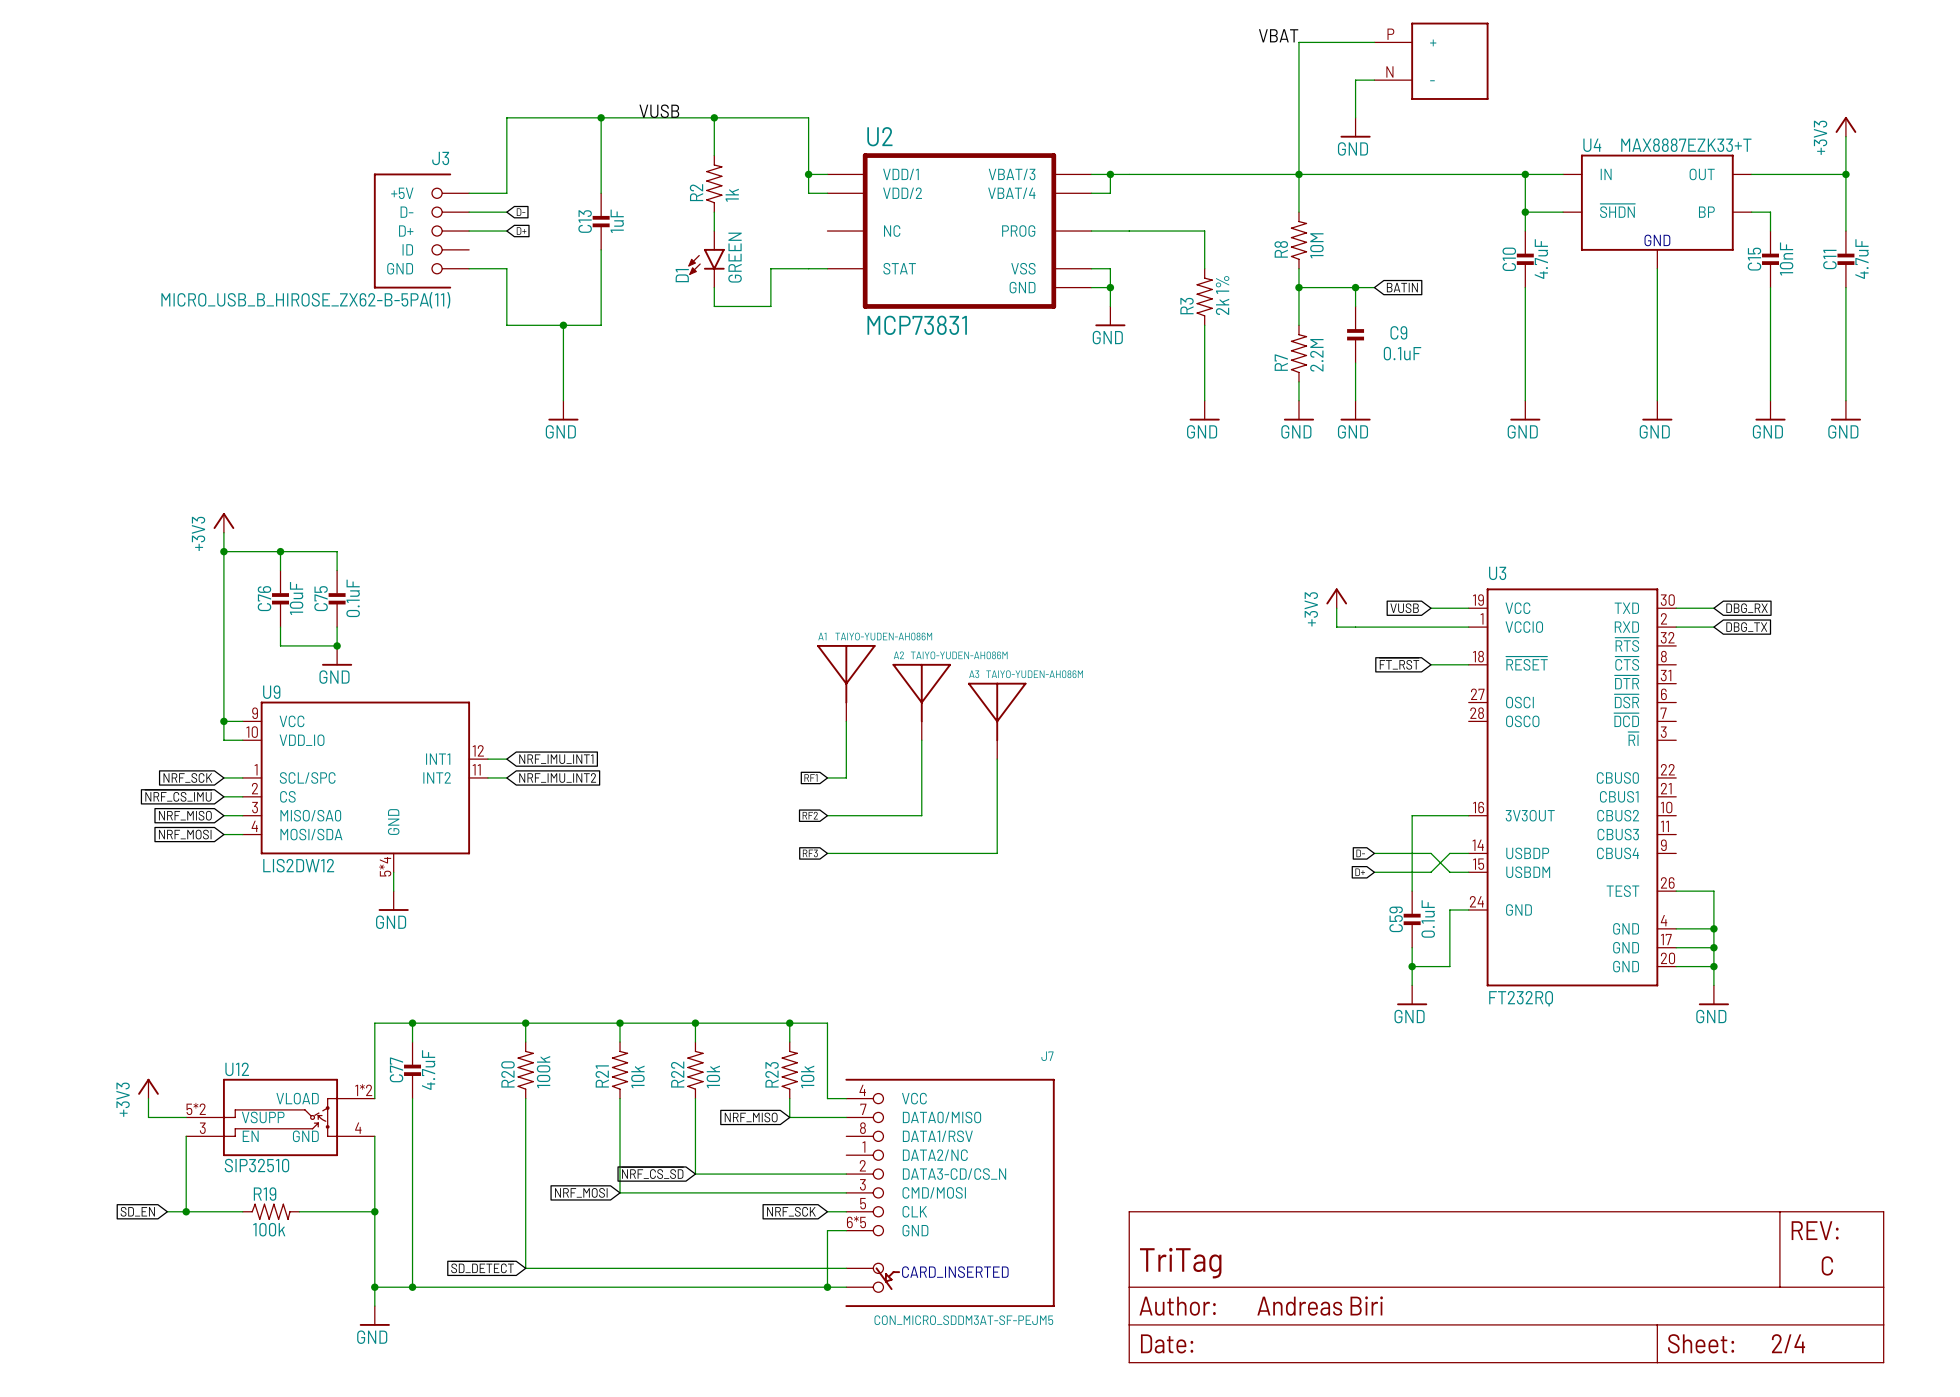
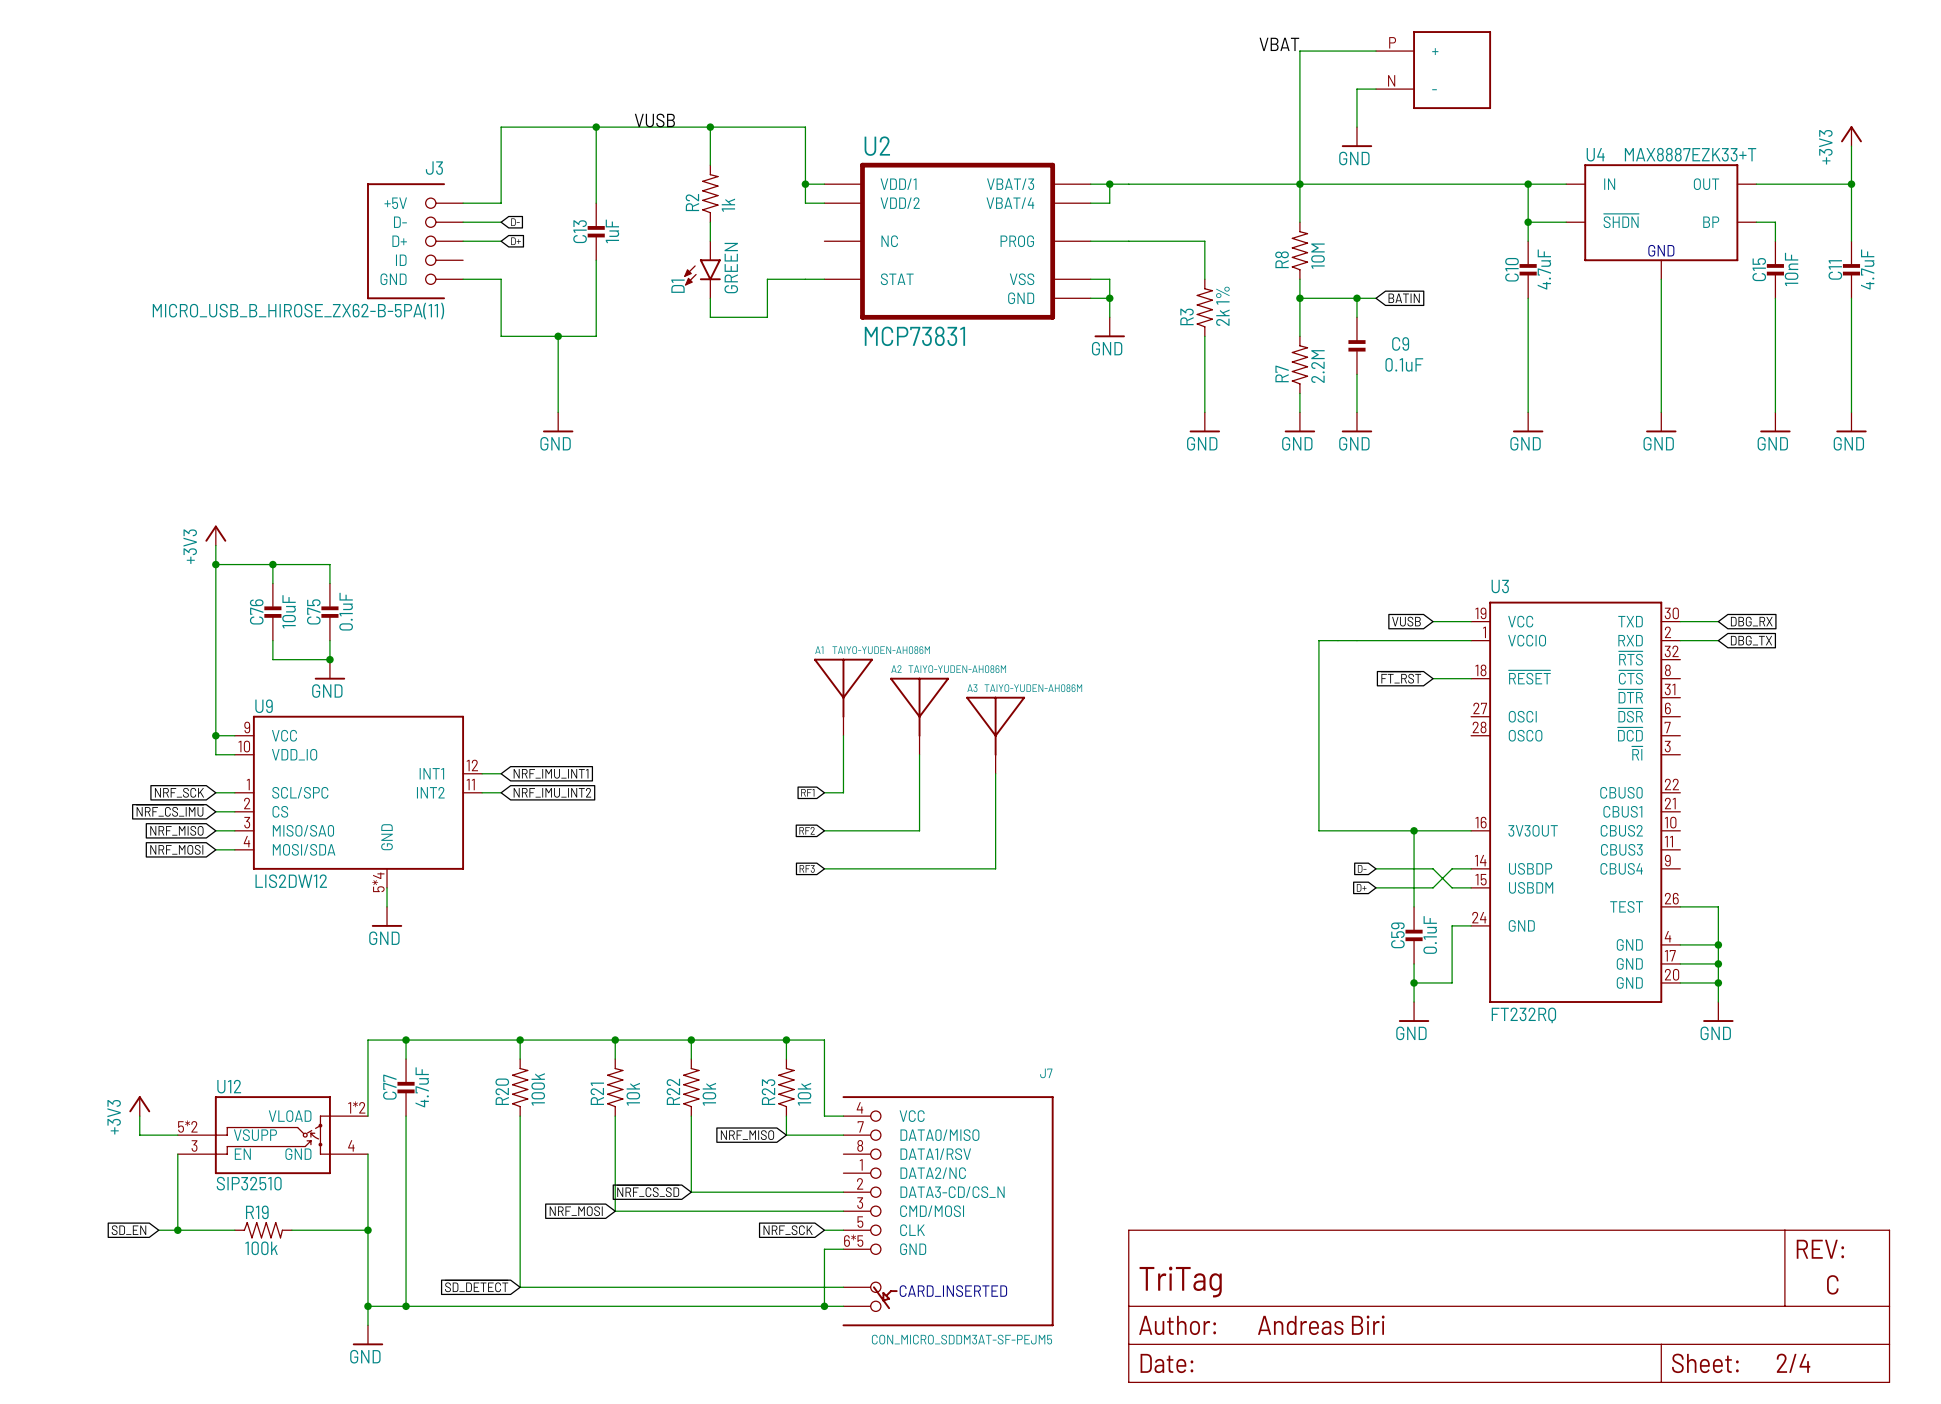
power symbol: +3V3 (1336, 598) -> none
wire: (1336, 608) (1336, 627) -> (1414, 830) (1318, 830) (1318, 640) (1337, 640)
junction: none -> (1414, 830)

